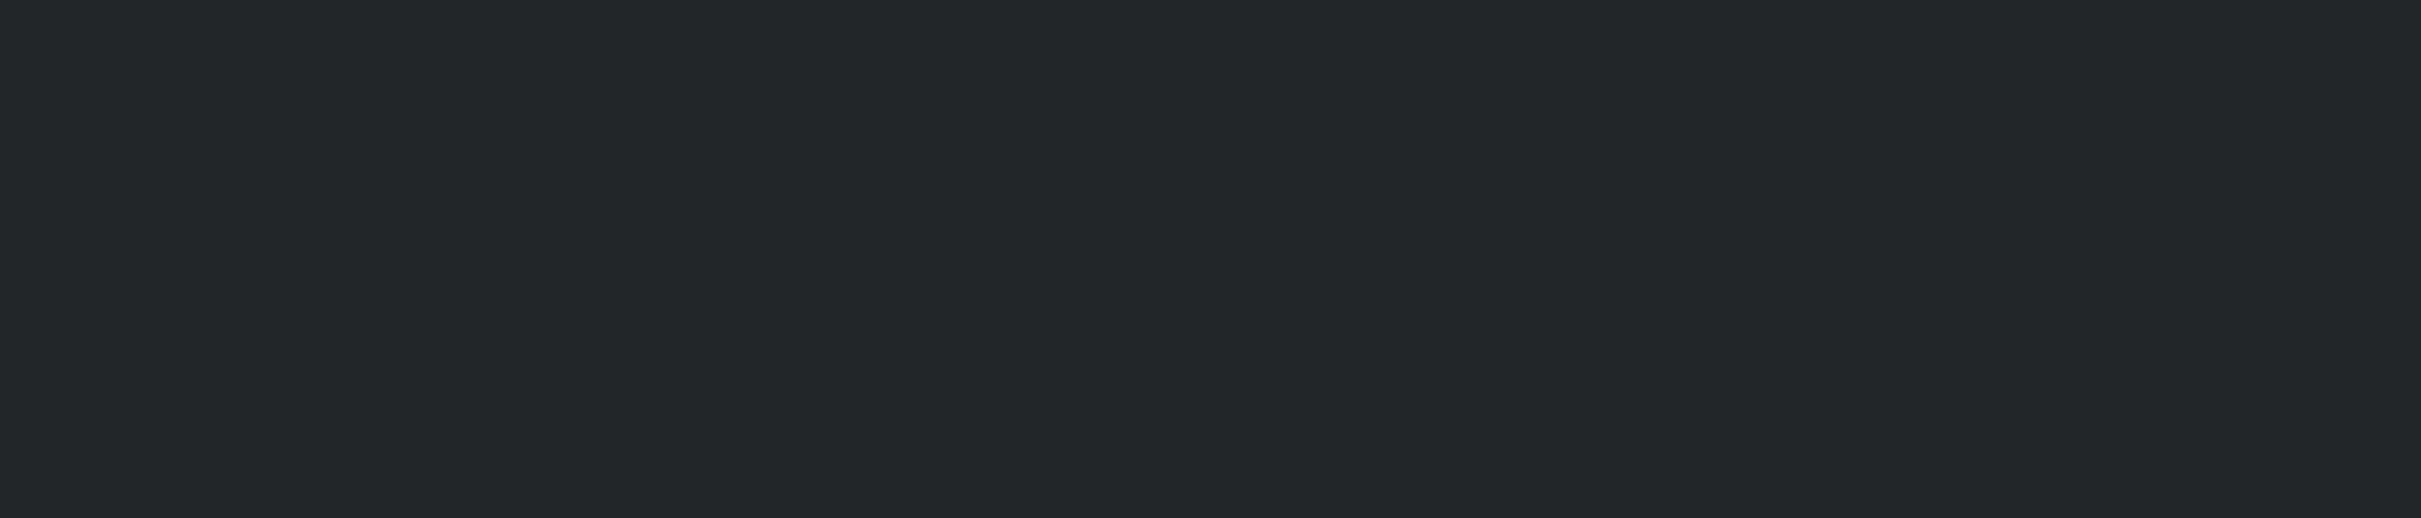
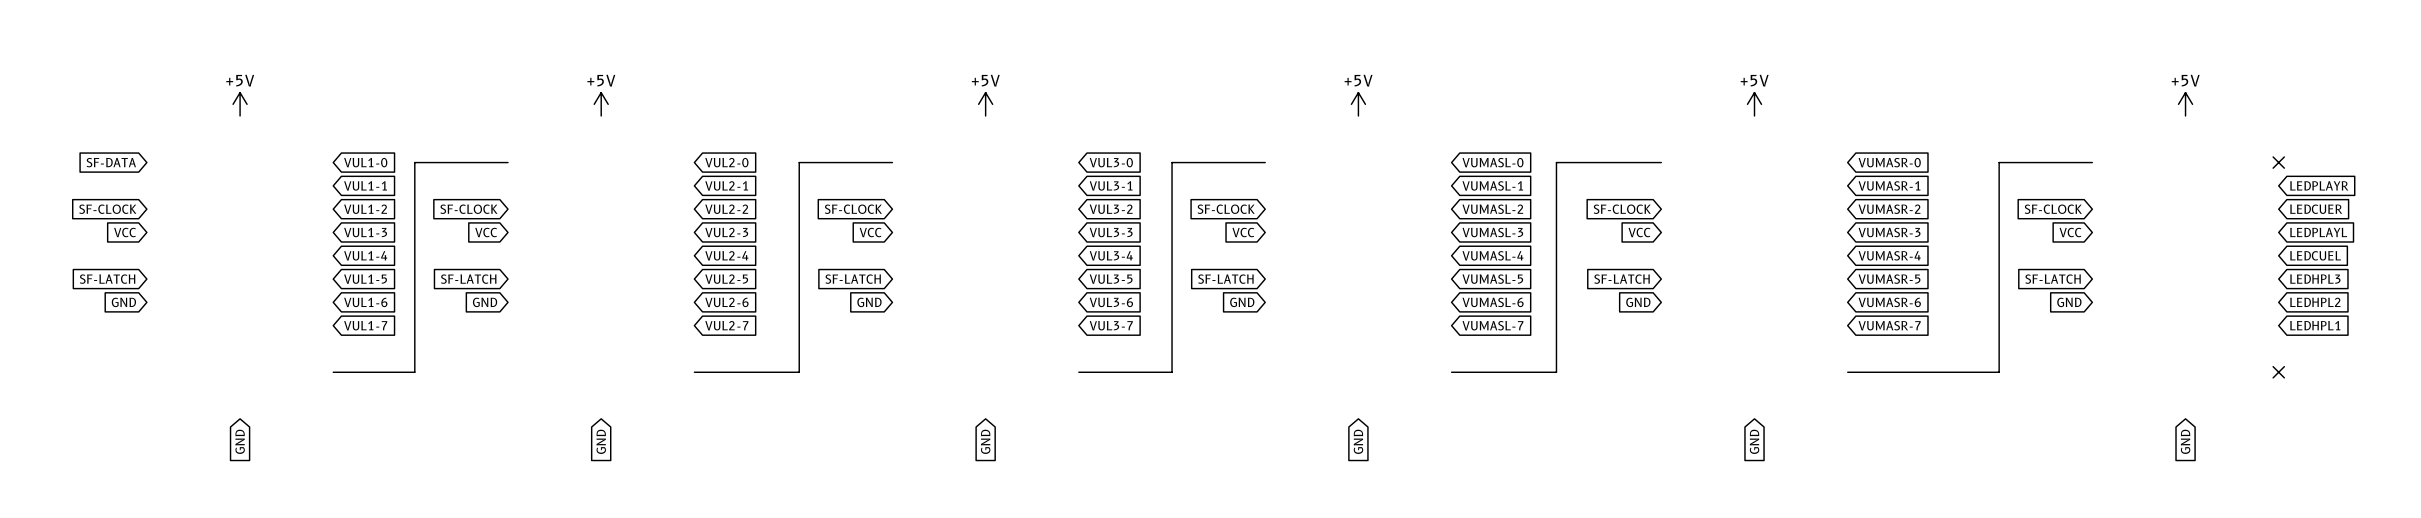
power symbol: none -> +5V (240, 104)
power symbol: none -> +5V (601, 104)
power symbol: none -> +5V (985, 104)
power symbol: none -> +5V (1358, 104)
power symbol: none -> +5V (1754, 104)
power symbol: none -> +5V (2185, 104)
global label: none -> SF-DATA (111, 162)
global label: none -> VUL1-0 (365, 162)
wire: none -> (508, 162) (414, 162) (414, 372) (333, 372)
global label: none -> VUL2-0 (726, 162)
wire: none -> (892, 162) (799, 162) (799, 372) (694, 372)
global label: none -> VUL3-0 (1111, 162)
wire: none -> (1265, 162) (1172, 162) (1172, 372) (1078, 372)
global label: none -> VUMASL-0 (1492, 162)
wire: none -> (1661, 162) (1556, 162) (1556, 372) (1451, 372)
global label: none -> VUMASR-0 (1889, 162)
wire: none -> (2092, 162) (1999, 162) (1999, 372) (1847, 372)
no-connect mark: none -> (2278, 162)
global label: none -> VUL1-1 (365, 185)
global label: none -> VUL2-1 (726, 185)
global label: none -> VUL3-1 (1111, 185)
global label: none -> VUMASL-1 (1492, 185)
global label: none -> VUMASR-1 (1889, 185)
global label: none -> LEDPLAYR (2319, 185)
global label: none -> SF-CLOCK (107, 209)
global label: none -> VUL1-2 (365, 209)
global label: none -> SF-CLOCK (468, 209)
global label: none -> VUL2-2 (726, 209)
global label: none -> SF-CLOCK (853, 209)
global label: none -> VUL3-2 (1111, 209)
global label: none -> SF-CLOCK (1226, 209)
global label: none -> VUMASL-2 (1492, 209)
global label: none -> SF-CLOCK (1622, 209)
global label: none -> VUMASR-2 (1889, 209)
global label: none -> SF-CLOCK (2053, 209)
global label: none -> LEDCUER (2316, 209)
global label: none -> VCC (125, 232)
global label: none -> VUL1-3 (365, 232)
global label: none -> VCC (486, 232)
global label: none -> VUL2-3 (726, 232)
global label: none -> VCC (870, 232)
global label: none -> VUL3-3 (1111, 232)
global label: none -> VCC (1243, 232)
global label: none -> VUMASL-3 (1492, 232)
global label: none -> VCC (1639, 232)
global label: none -> VUMASR-3 (1889, 232)
global label: none -> VCC (2070, 232)
global label: none -> LEDPLAYL (2318, 232)
global label: none -> VUL1-4 (365, 255)
global label: none -> VUL2-4 (726, 255)
global label: none -> VUL3-4 (1111, 255)
global label: none -> VUMASL-4 (1492, 255)
global label: none -> VUMASR-4 (1889, 255)
global label: none -> LEDCUEL (2315, 255)
global label: none -> SF-LATCH (107, 279)
global label: none -> VUL1-5 (365, 279)
global label: none -> SF-LATCH (468, 279)
global label: none -> VUL2-5 (726, 279)
global label: none -> SF-LATCH (853, 279)
global label: none -> VUL3-5 (1111, 279)
global label: none -> SF-LATCH (1225, 279)
global label: none -> VUMASL-5 (1492, 279)
global label: none -> SF-LATCH (1622, 279)
global label: none -> VUMASR-5 (1889, 279)
global label: none -> SF-LATCH (2053, 279)
global label: none -> LEDHPL3 (2315, 279)
global label: none -> GND (123, 302)
global label: none -> VUL1-6 (365, 302)
global label: none -> GND (485, 302)
global label: none -> VUL2-6 (726, 302)
global label: none -> GND (869, 302)
global label: none -> VUL3-6 (1111, 302)
global label: none -> GND (1242, 302)
global label: none -> VUMASL-6 (1493, 302)
global label: none -> GND (1638, 302)
global label: none -> VUMASR-6 (1889, 302)
global label: none -> GND (2069, 302)
global label: none -> LEDHPL2 (2315, 302)
global label: none -> VUL1-7 (365, 325)
global label: none -> VUL2-7 (726, 325)
global label: none -> VUL3-7 (1111, 325)
global label: none -> VUMASL-7 (1492, 325)
global label: none -> VUMASR-7 (1889, 325)
global label: none -> LEDHPL1 (2315, 325)
no-connect mark: none -> (2278, 372)
global label: none -> GND (240, 441)
global label: none -> GND (601, 441)
global label: none -> GND (985, 441)
global label: none -> GND (1358, 441)
global label: none -> GND (1754, 441)
global label: none -> GND (2185, 441)

